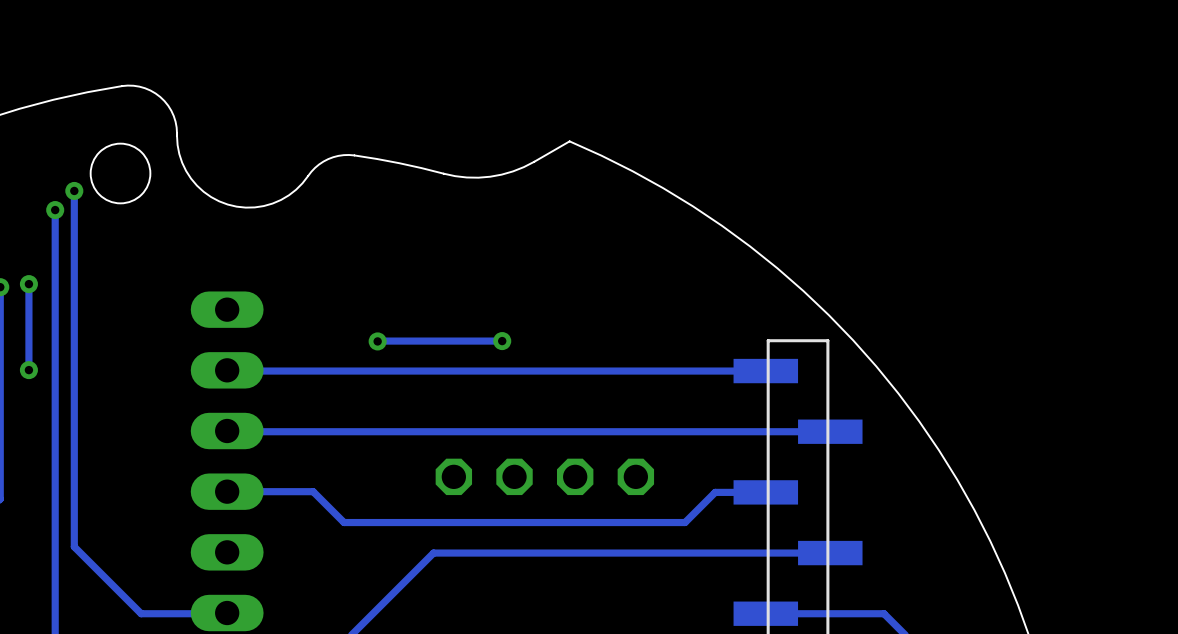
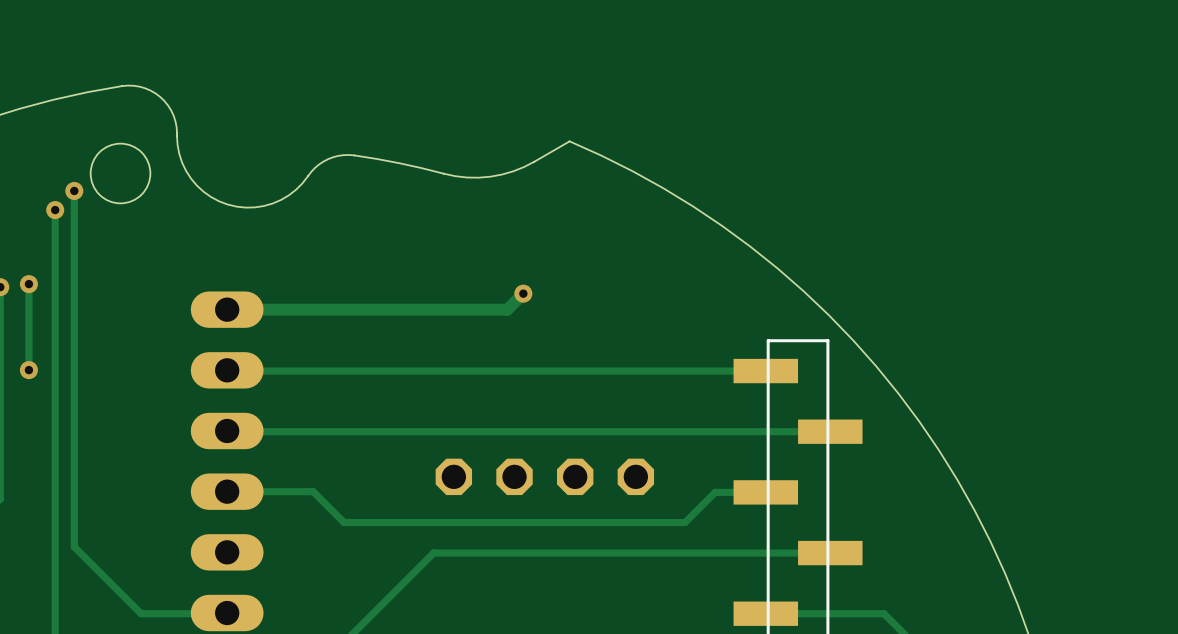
track: none -> (523, 293) (507, 309) (227, 309)
via: (377, 341) -> none
track: (502, 341) (377, 341) -> none
via position: (502, 341) -> (523, 293)

